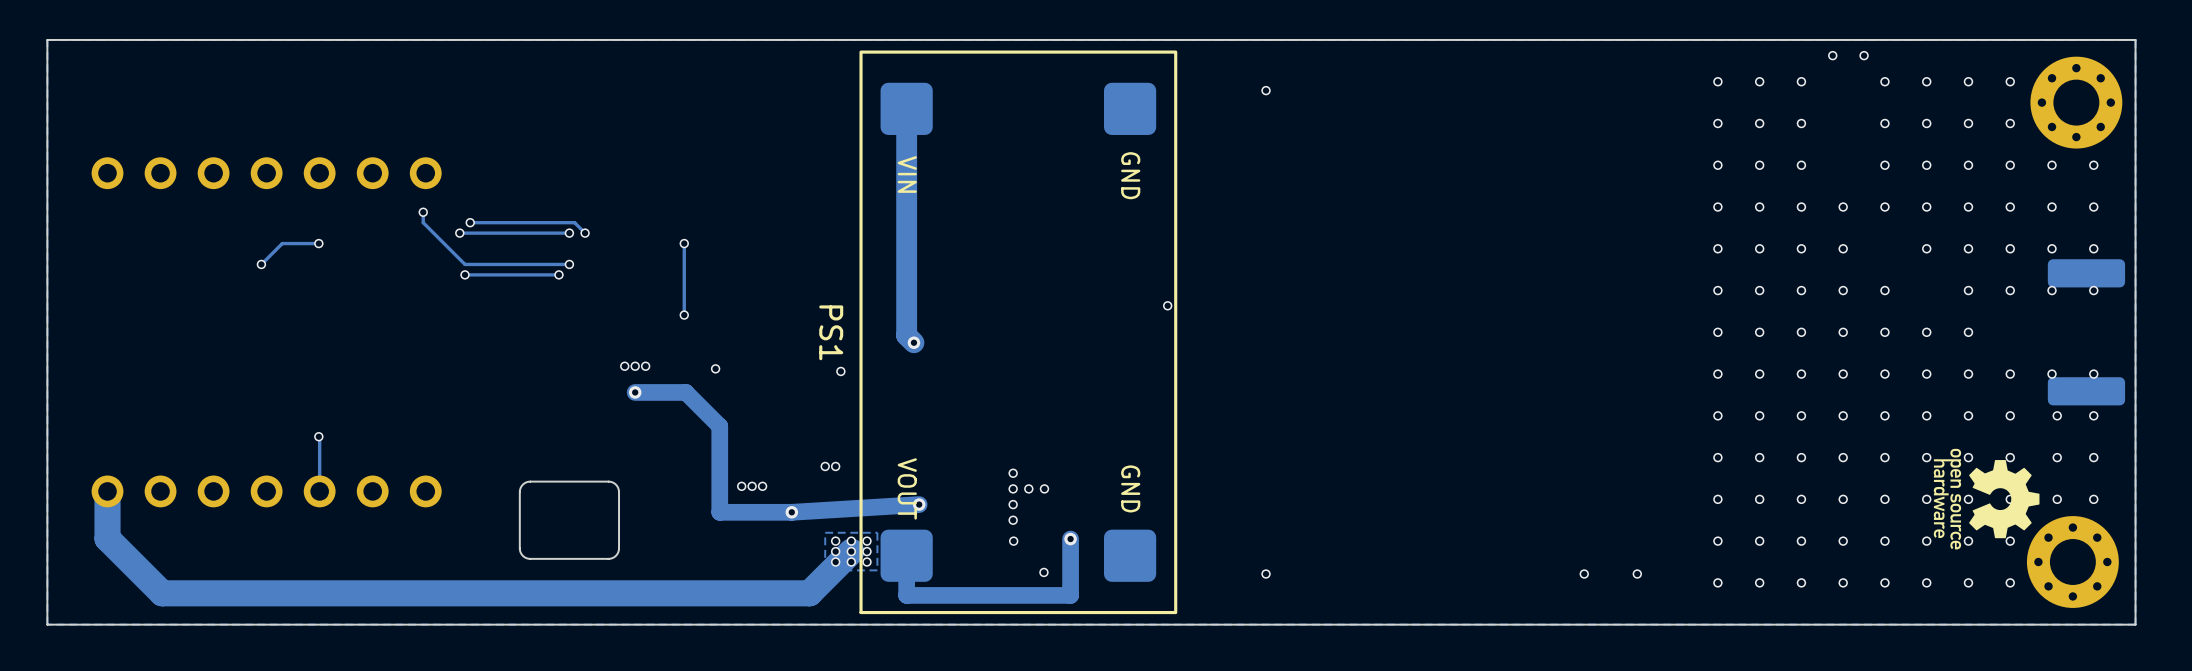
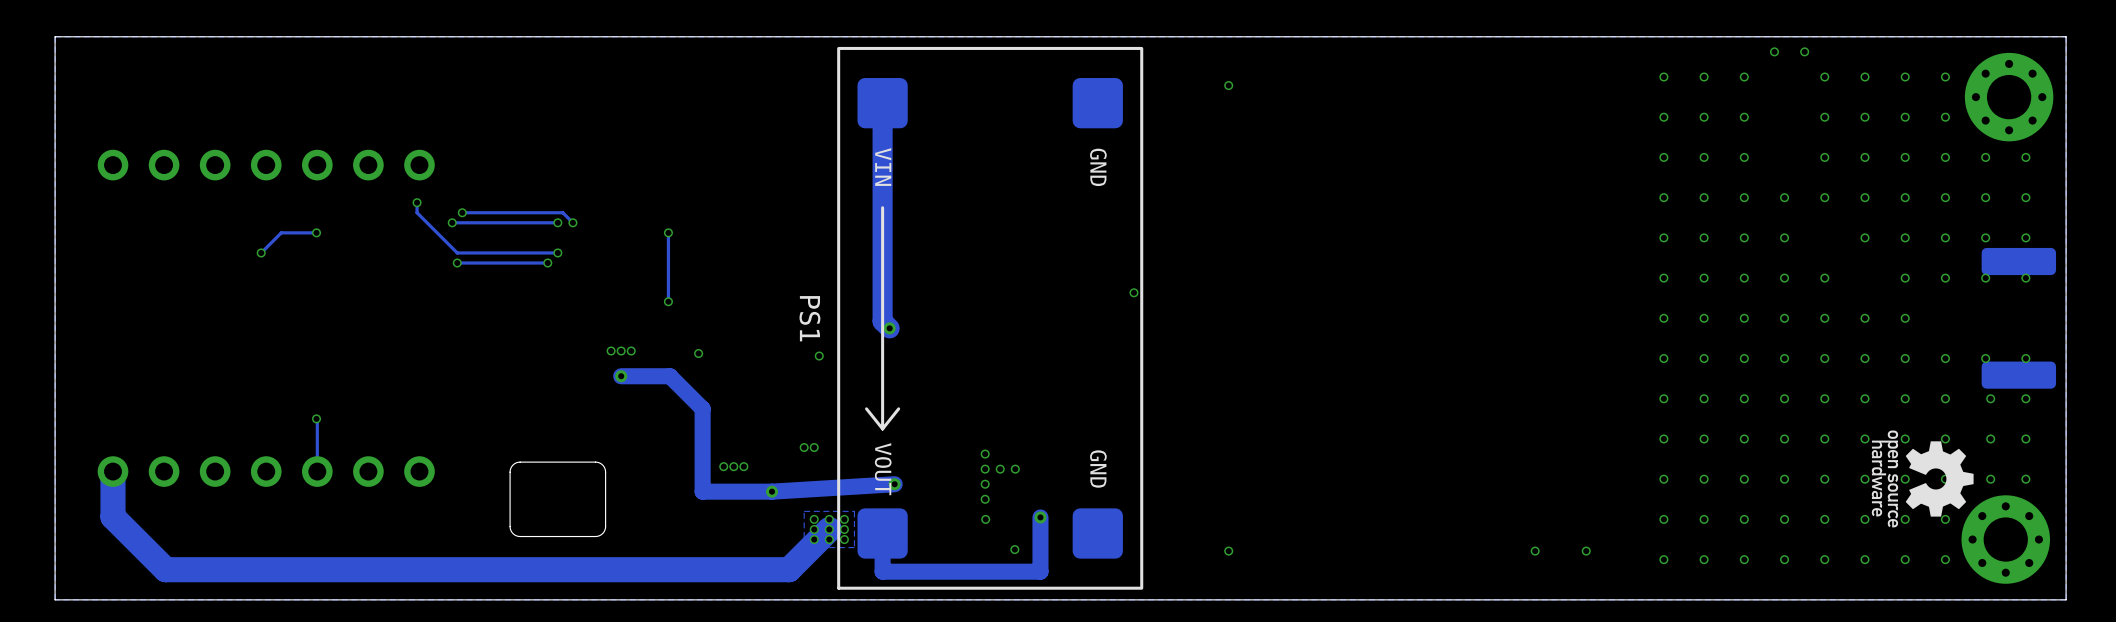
PS1 footprint: [859, 50, 1178, 615] -> [837, 46, 1144, 590]

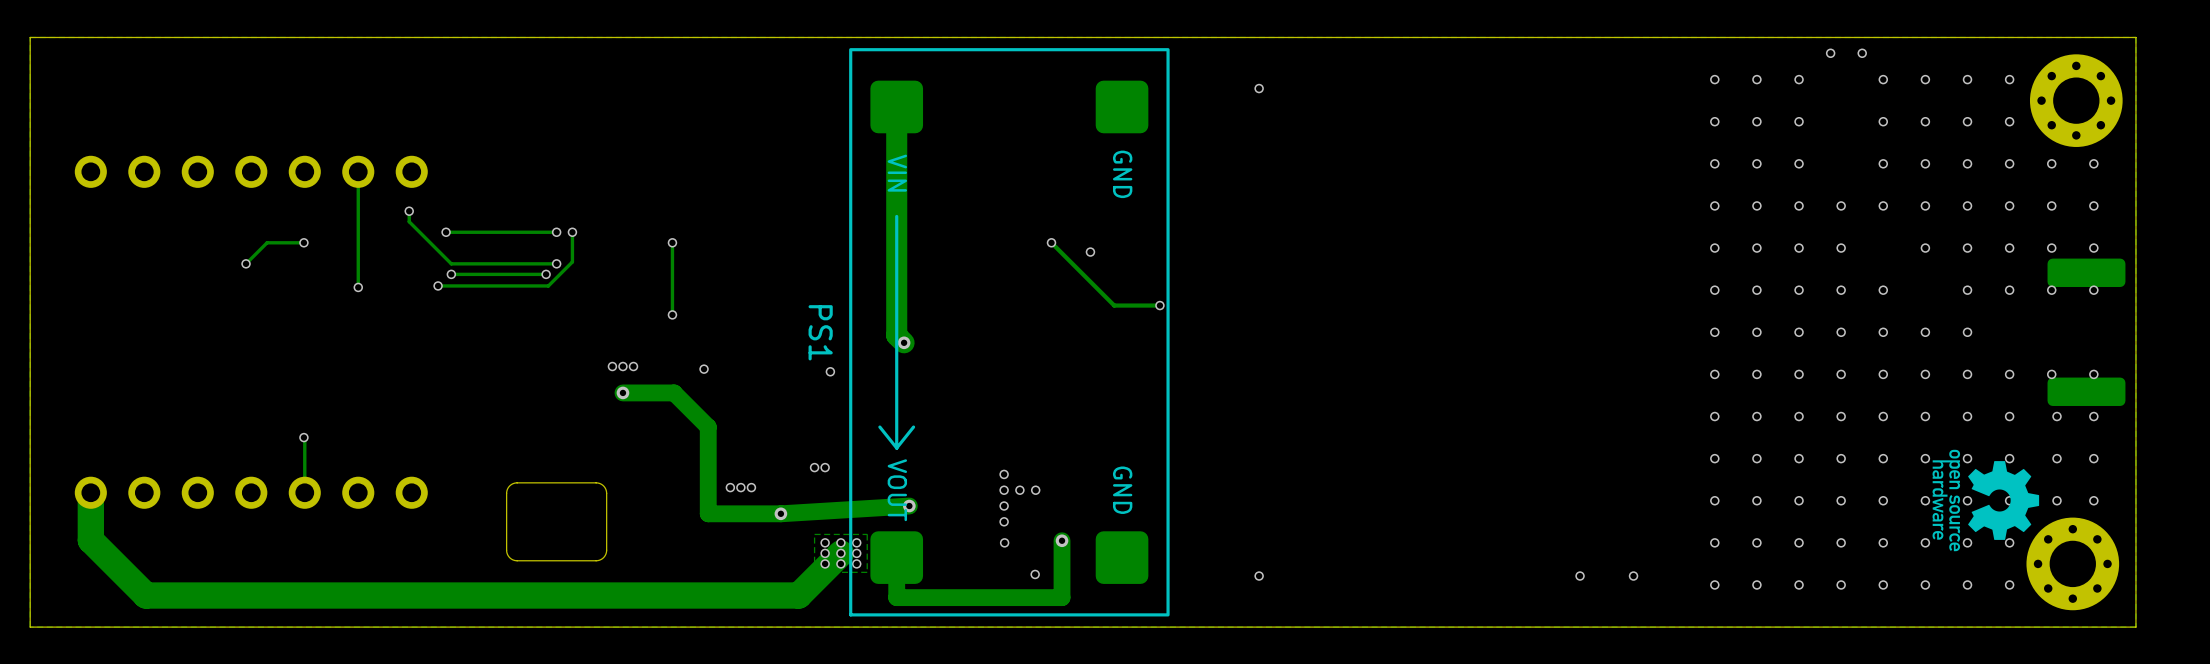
track: none -> (358, 171) (358, 287)
track: (462, 212) (562, 212) (572, 222) -> (438, 285) (548, 285) (572, 261) (572, 232)
via: (462, 212) -> none
track: none -> (1051, 242) (1114, 305) (1159, 305)
via: none -> (1051, 242)
via: none -> (1090, 252)
via: none -> (438, 285)
via: none -> (358, 287)

